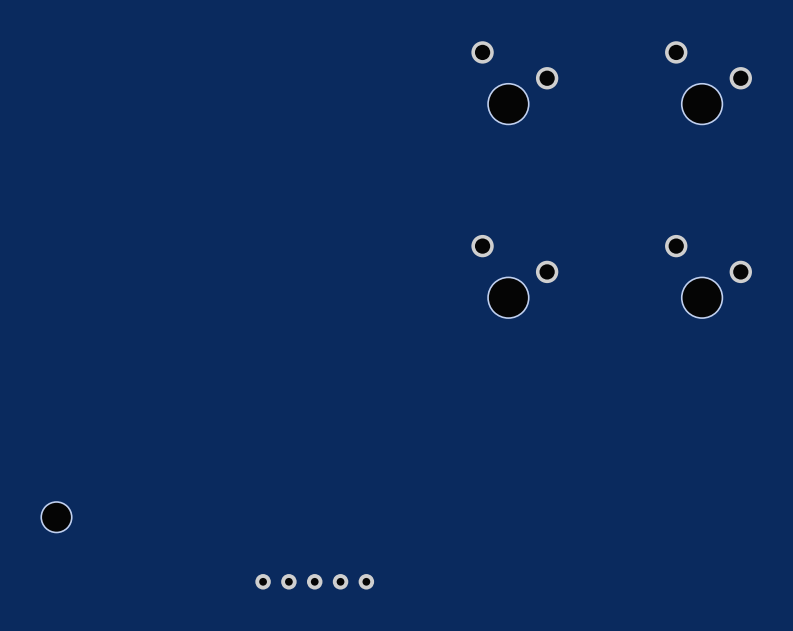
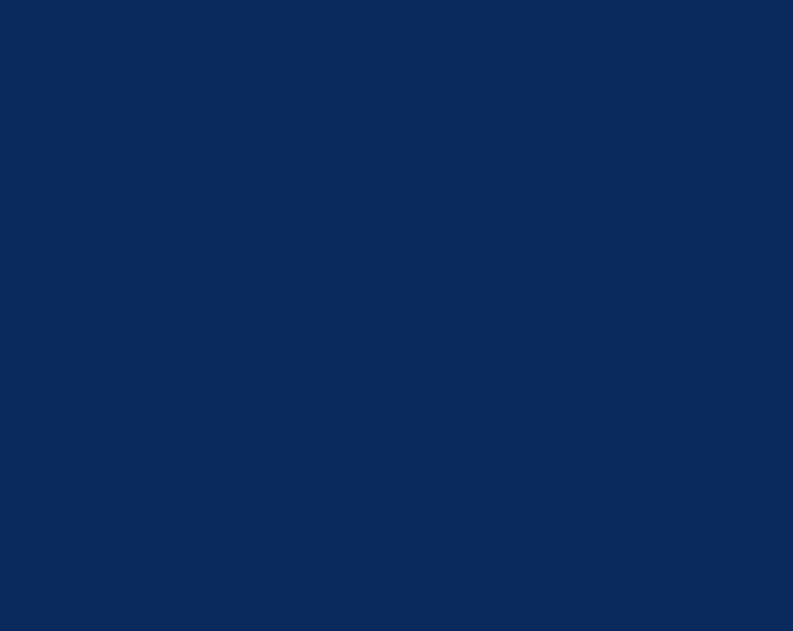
part: (514, 82) -> none
part: (708, 82) -> none
part: (514, 276) -> none
part: (708, 276) -> none
part: (56, 517) -> none
part: (314, 581) -> none

